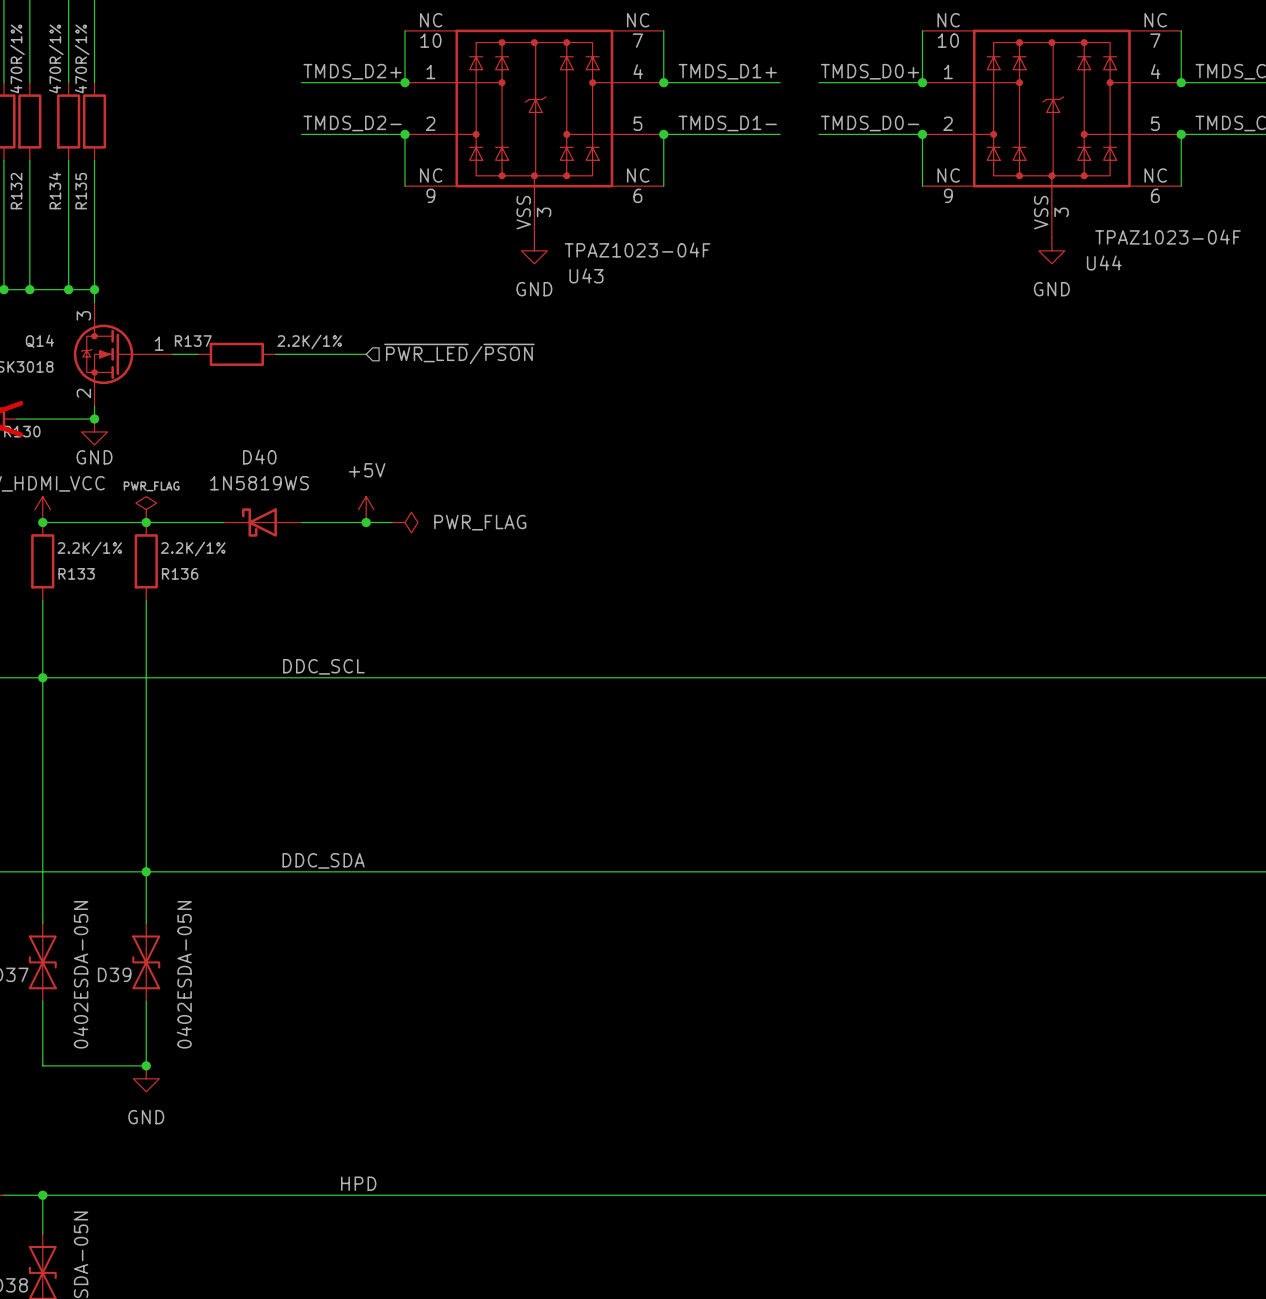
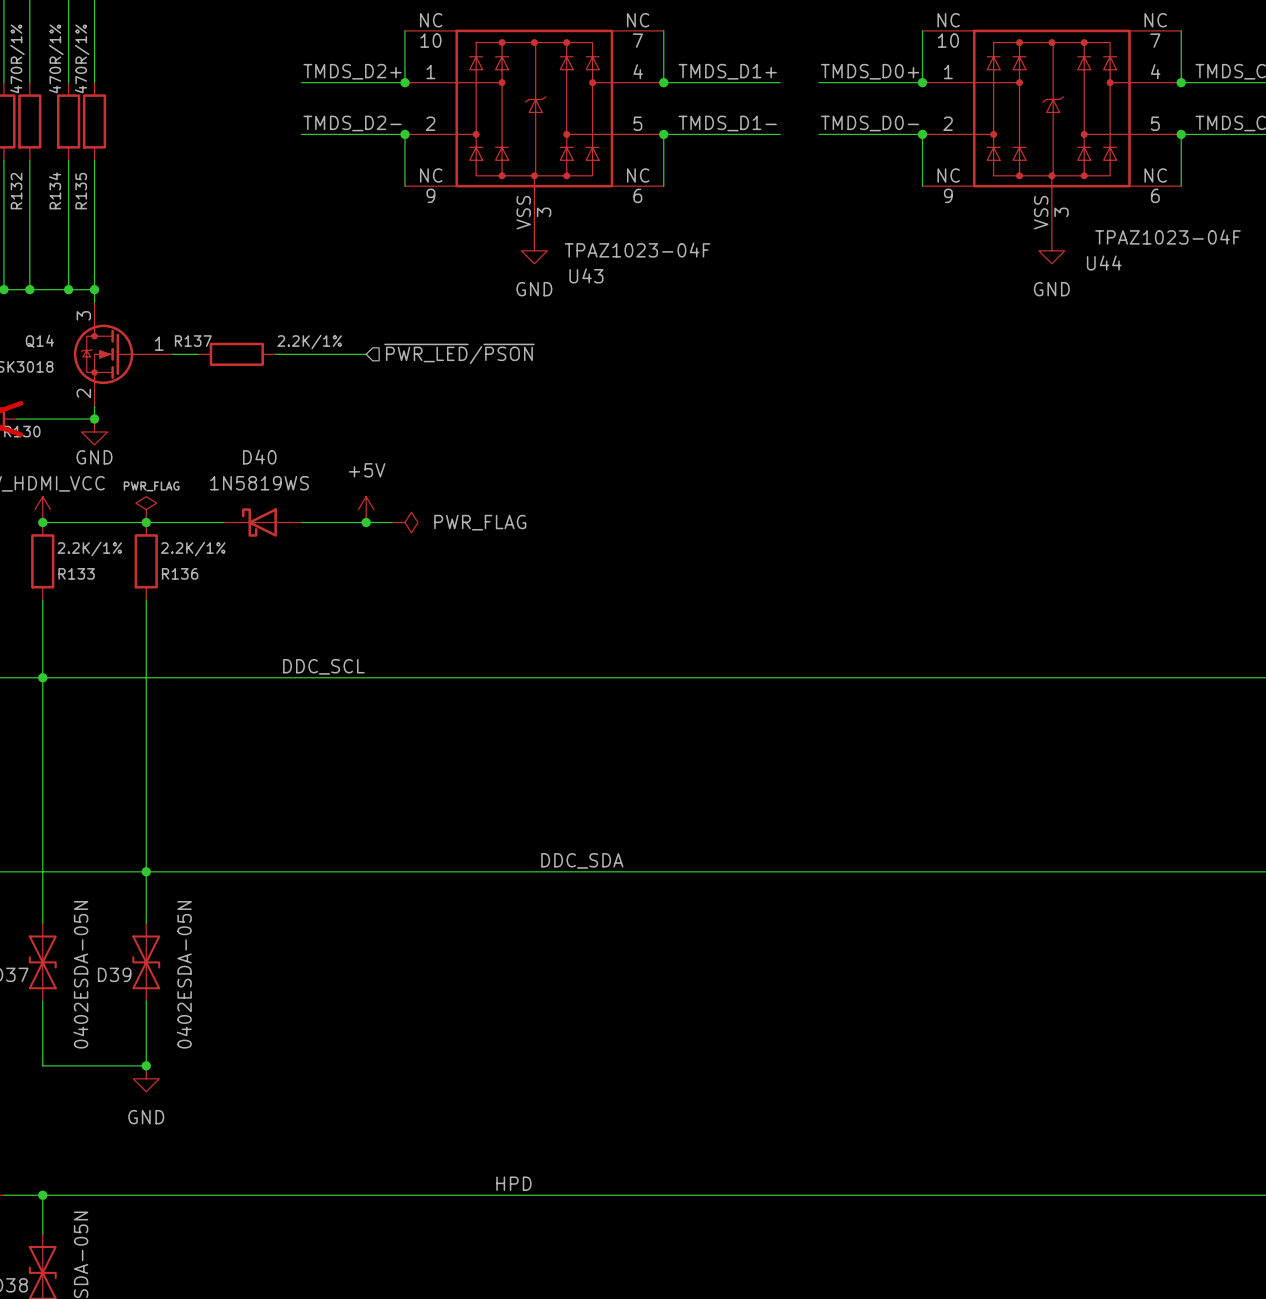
label: DDC_SDA (323, 860) -> none
label: none -> DDC_SDA (582, 860)
label position: HPD (358, 1183) -> HPD (513, 1183)

